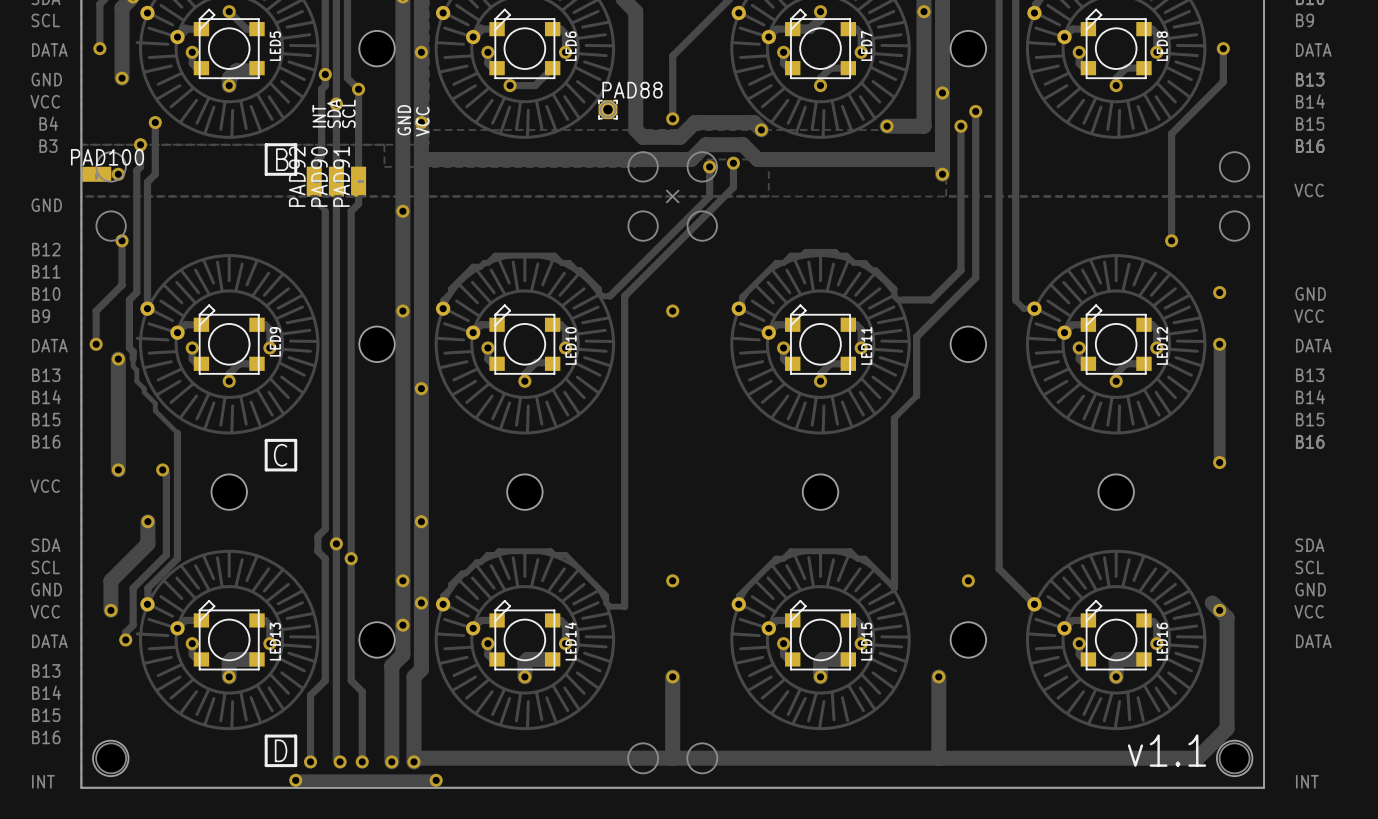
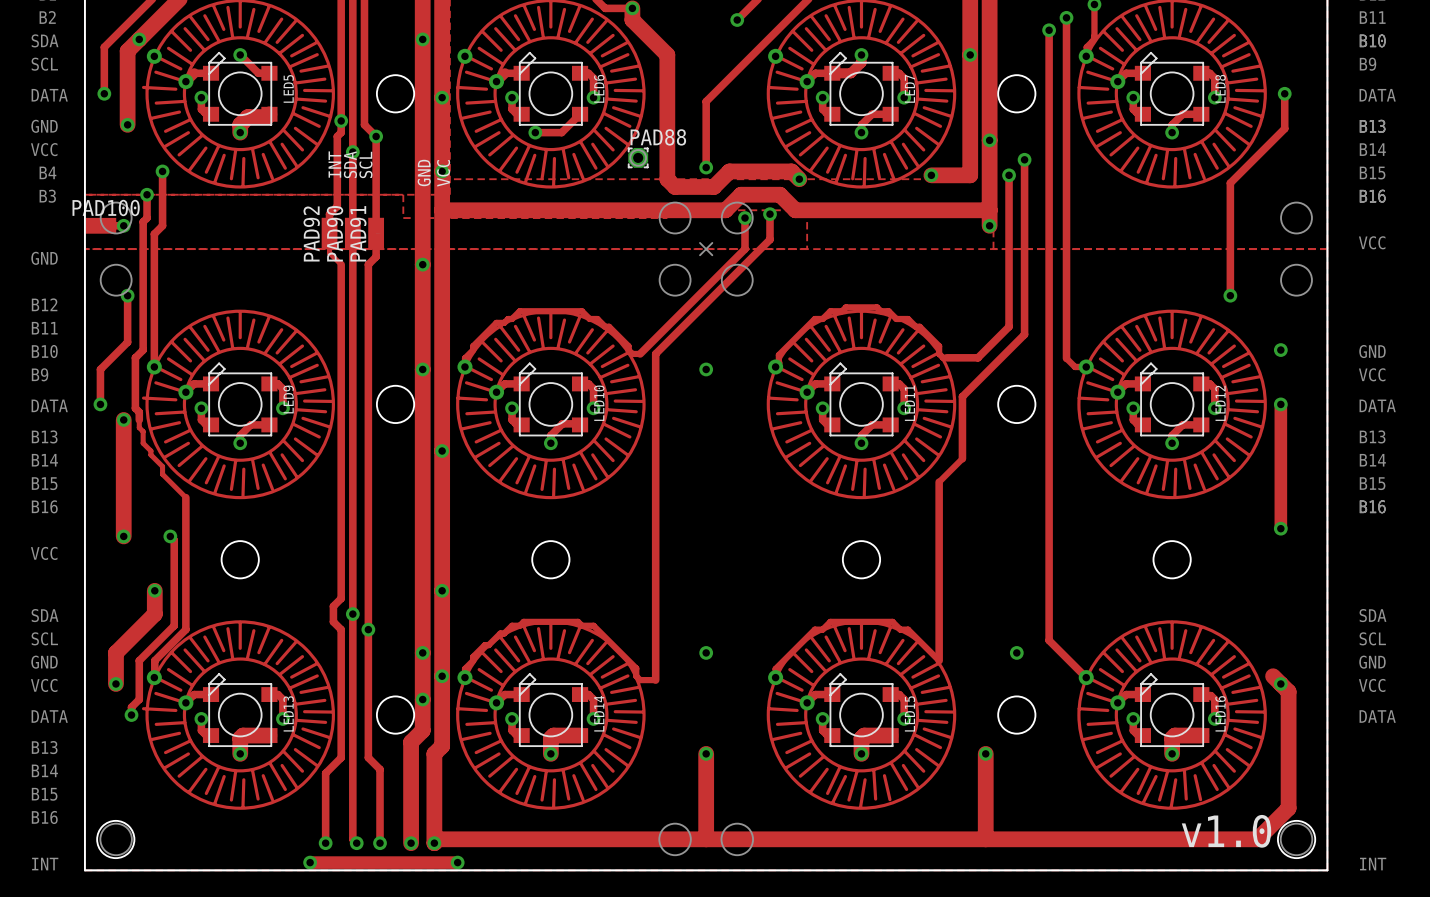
line: (266, 144) (266, 174) (295, 174) (295, 144) (266, 144) -> none
text: B (282, 159) -> none
line: (266, 440) (295, 440) (295, 469) (266, 469) (266, 440) -> none
text: C (280, 455) -> none
line: (266, 736) (295, 736) (295, 765) (266, 765) (266, 736) -> none
text: D (281, 750) -> none
text: v1.1 (1166, 750) -> v1.0 (1226, 831)

